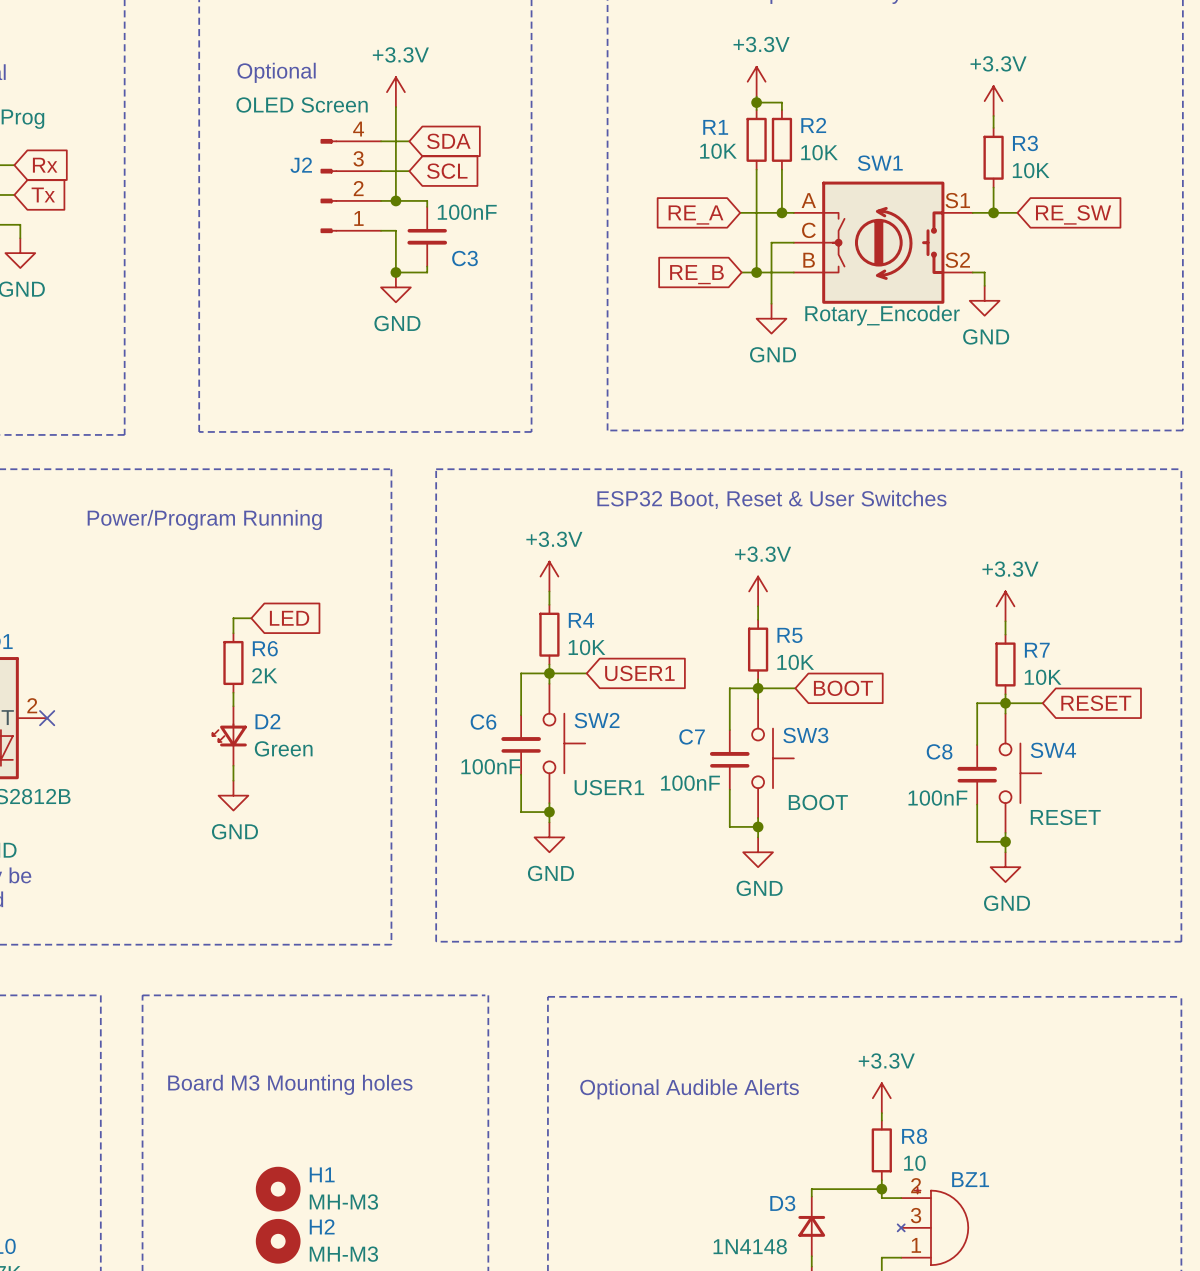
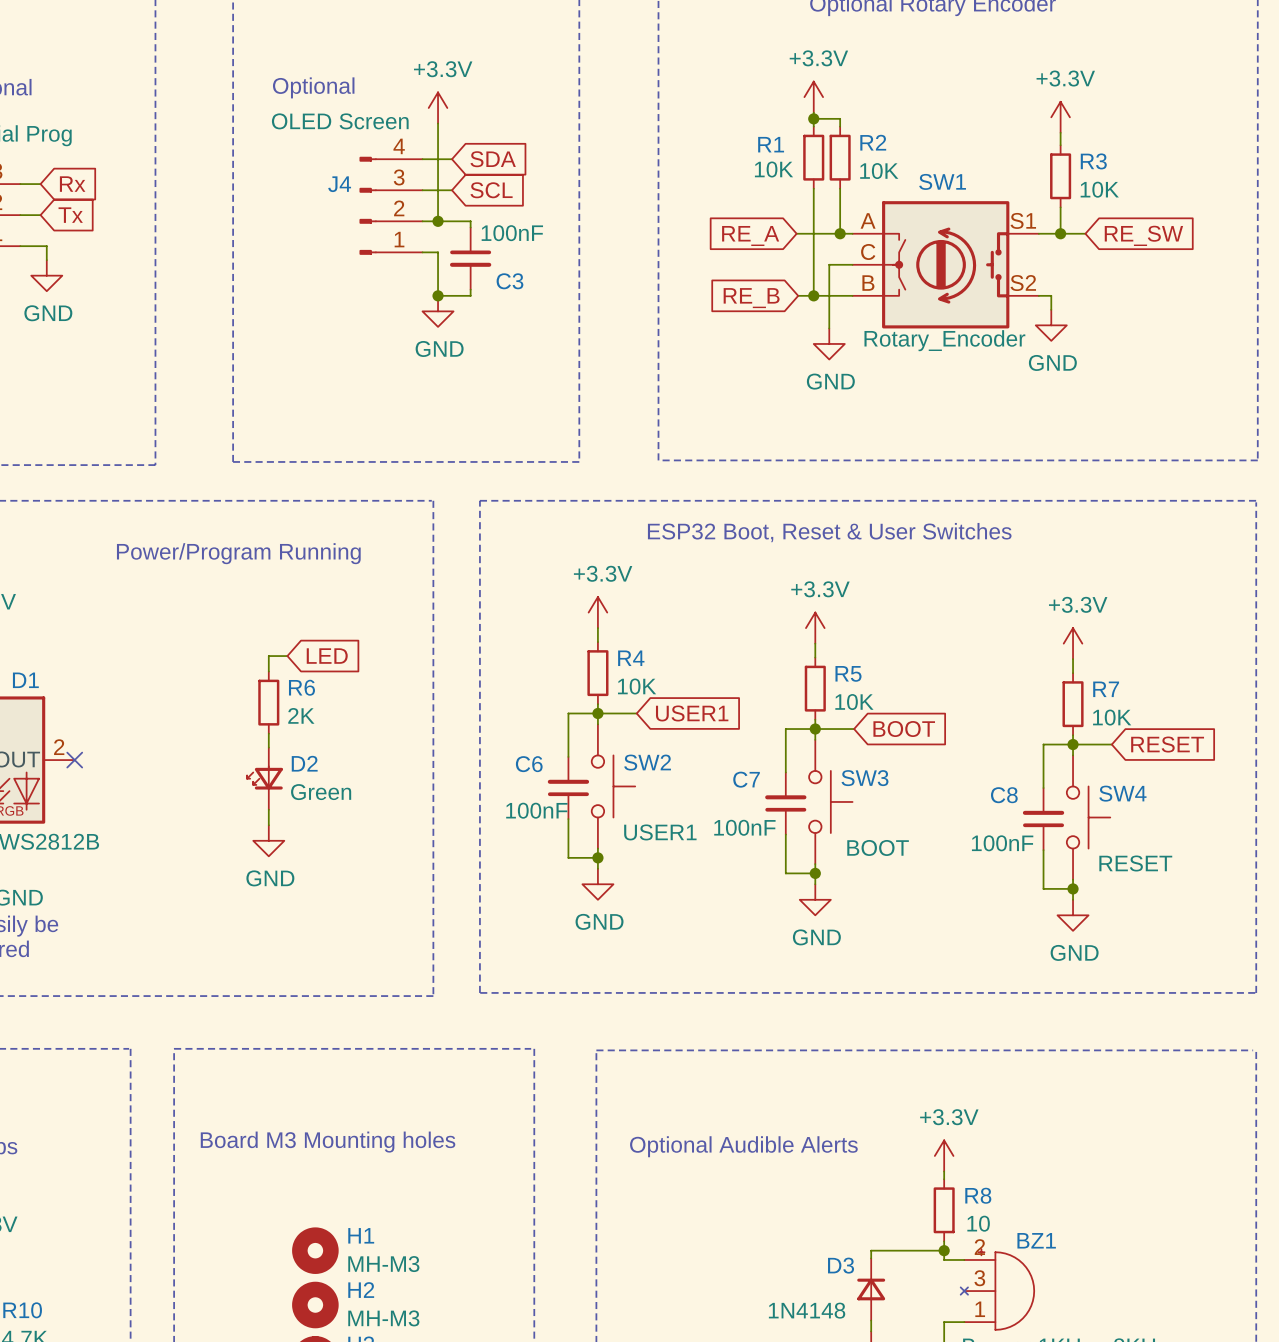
J2 name: J2 (301, 165) -> J4 (339, 184)

